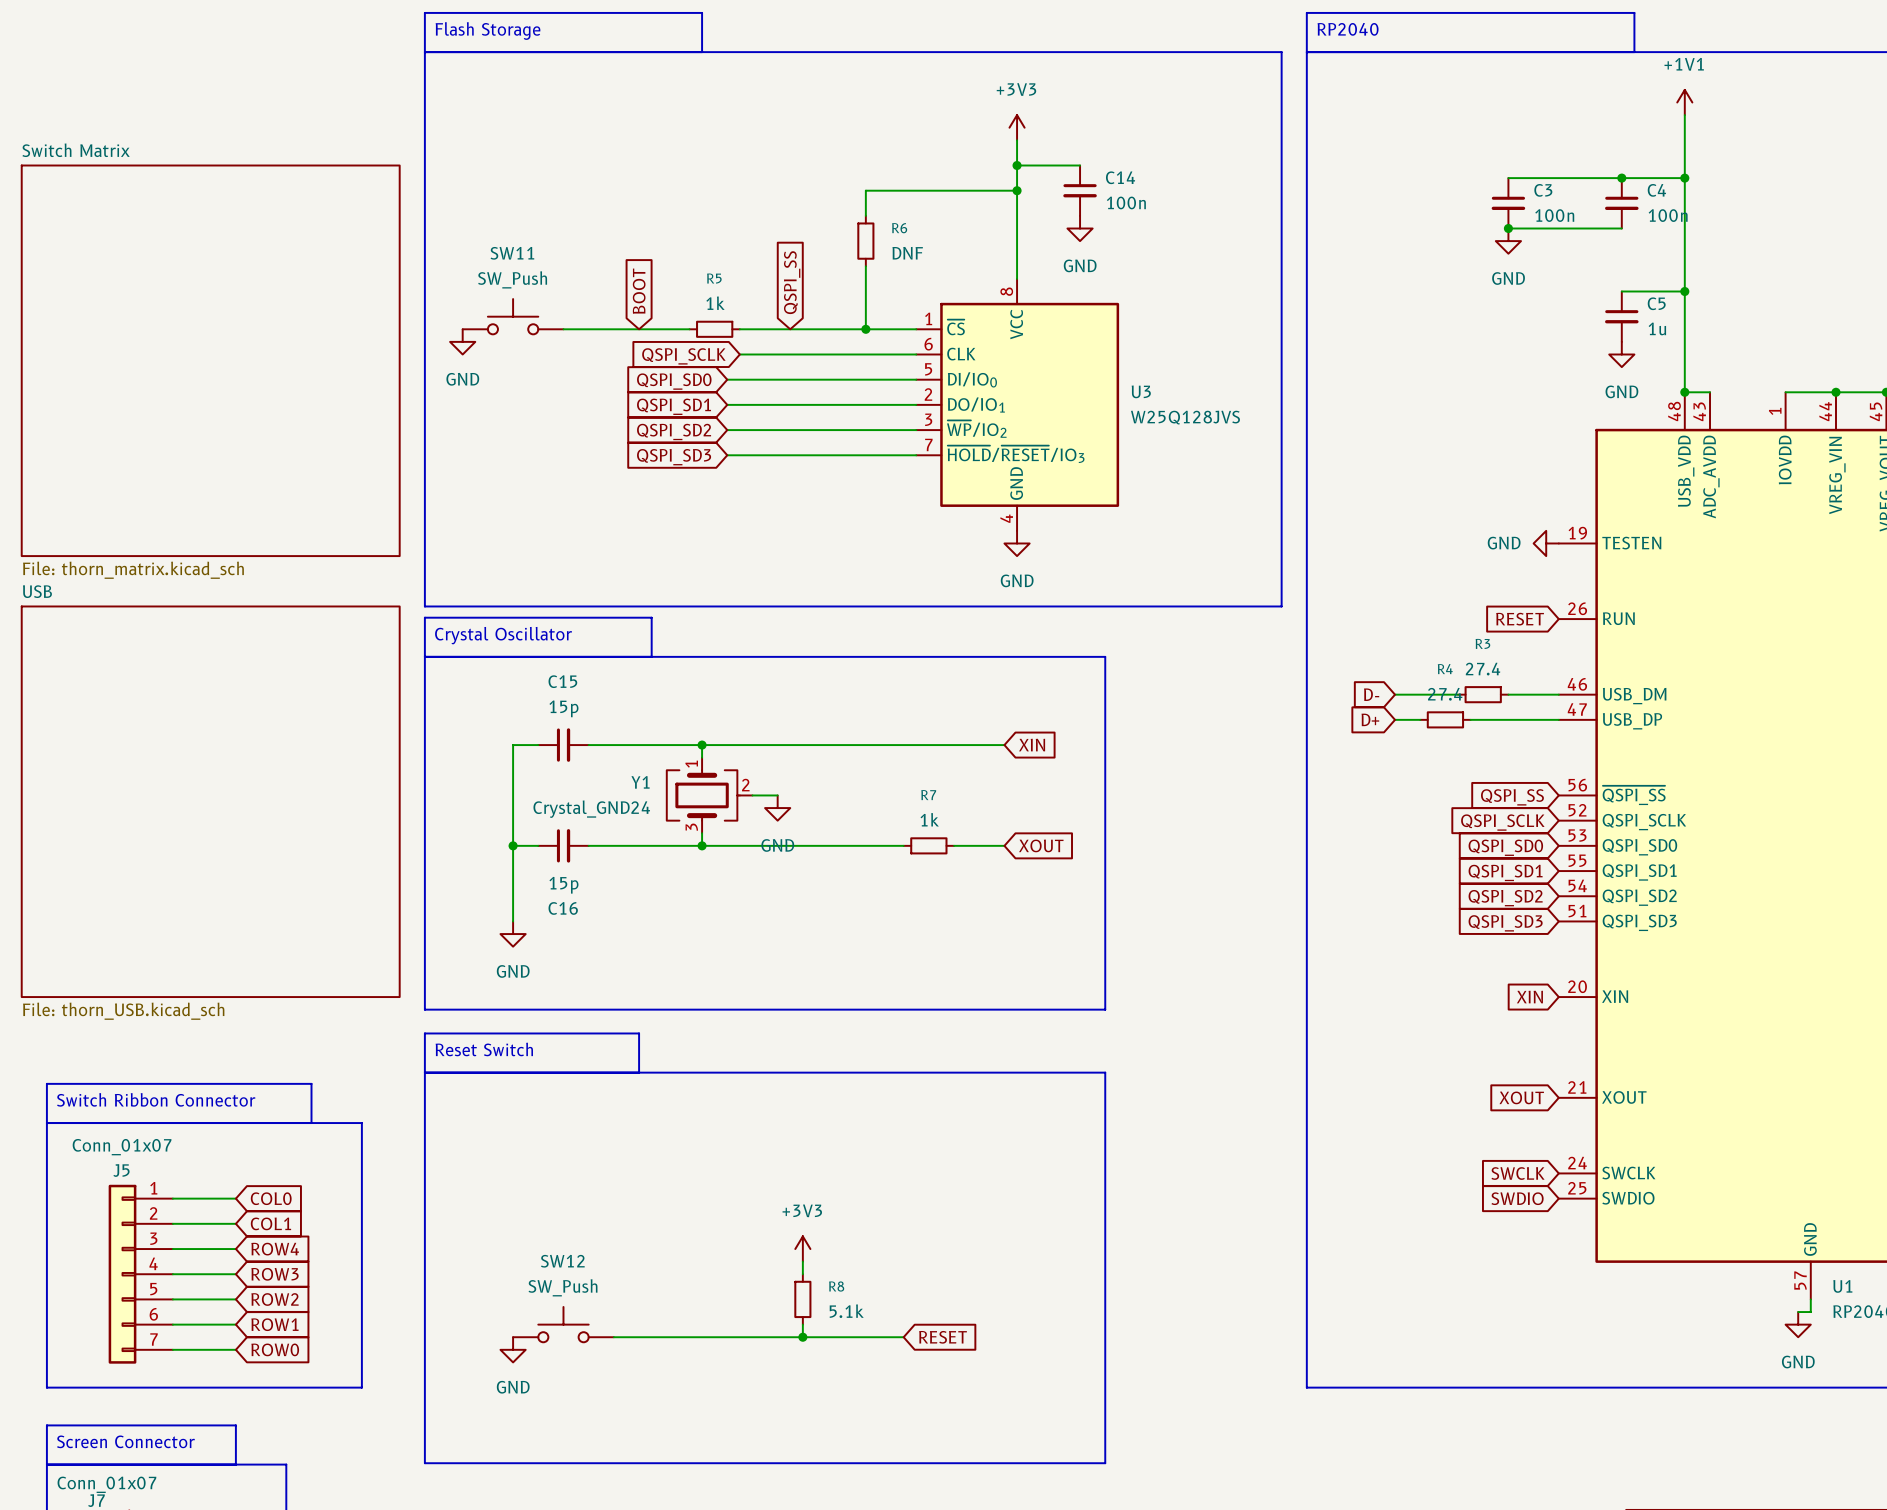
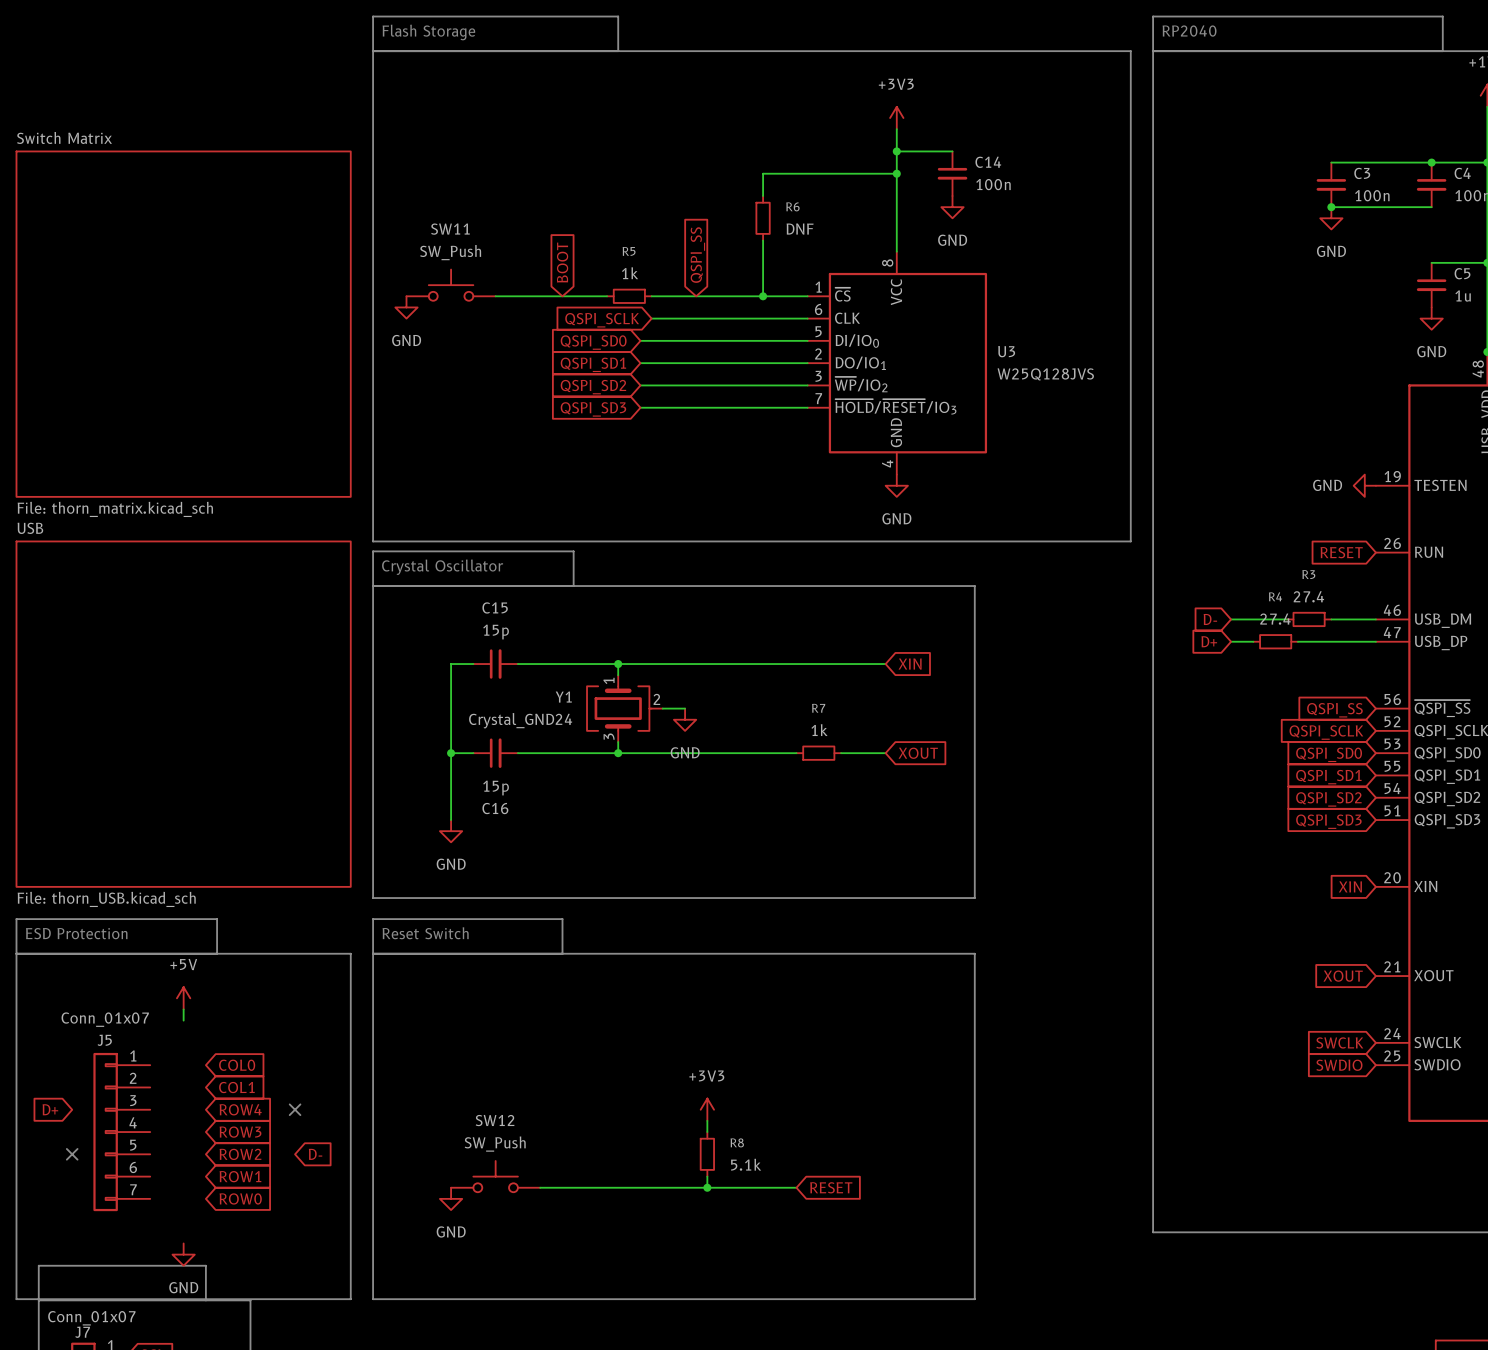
text: none -> ESD Protection (76, 933)
line: none -> (16, 953) (350, 953) (350, 1299) (16, 1299) (16, 919) (217, 919) (217, 953)
text: Switch Ribbon Connector (156, 1099) -> none
line: (46, 1123) (361, 1123) (361, 1387) (46, 1387) (46, 1083) (311, 1083) (311, 1123) -> none
power symbol: none -> +5V (183, 998)
wire: none -> (183, 1009) (183, 1020)
wire: (172, 1198) (235, 1198) -> none
wire: (172, 1223) (235, 1223) -> none
global label: none -> D+ (50, 1109)
wire: (172, 1249) (235, 1249) -> none
no-connect mark: none -> (295, 1109)
wire: (172, 1274) (235, 1274) -> none
no-connect mark: none -> (72, 1154)
wire: (172, 1299) (235, 1299) -> none
global label: none -> D- (315, 1154)
wire: (172, 1324) (235, 1324) -> none
wire: (172, 1349) (235, 1349) -> none
power symbol: none -> GND (183, 1254)
text: Screen Connector (125, 1441) -> none

